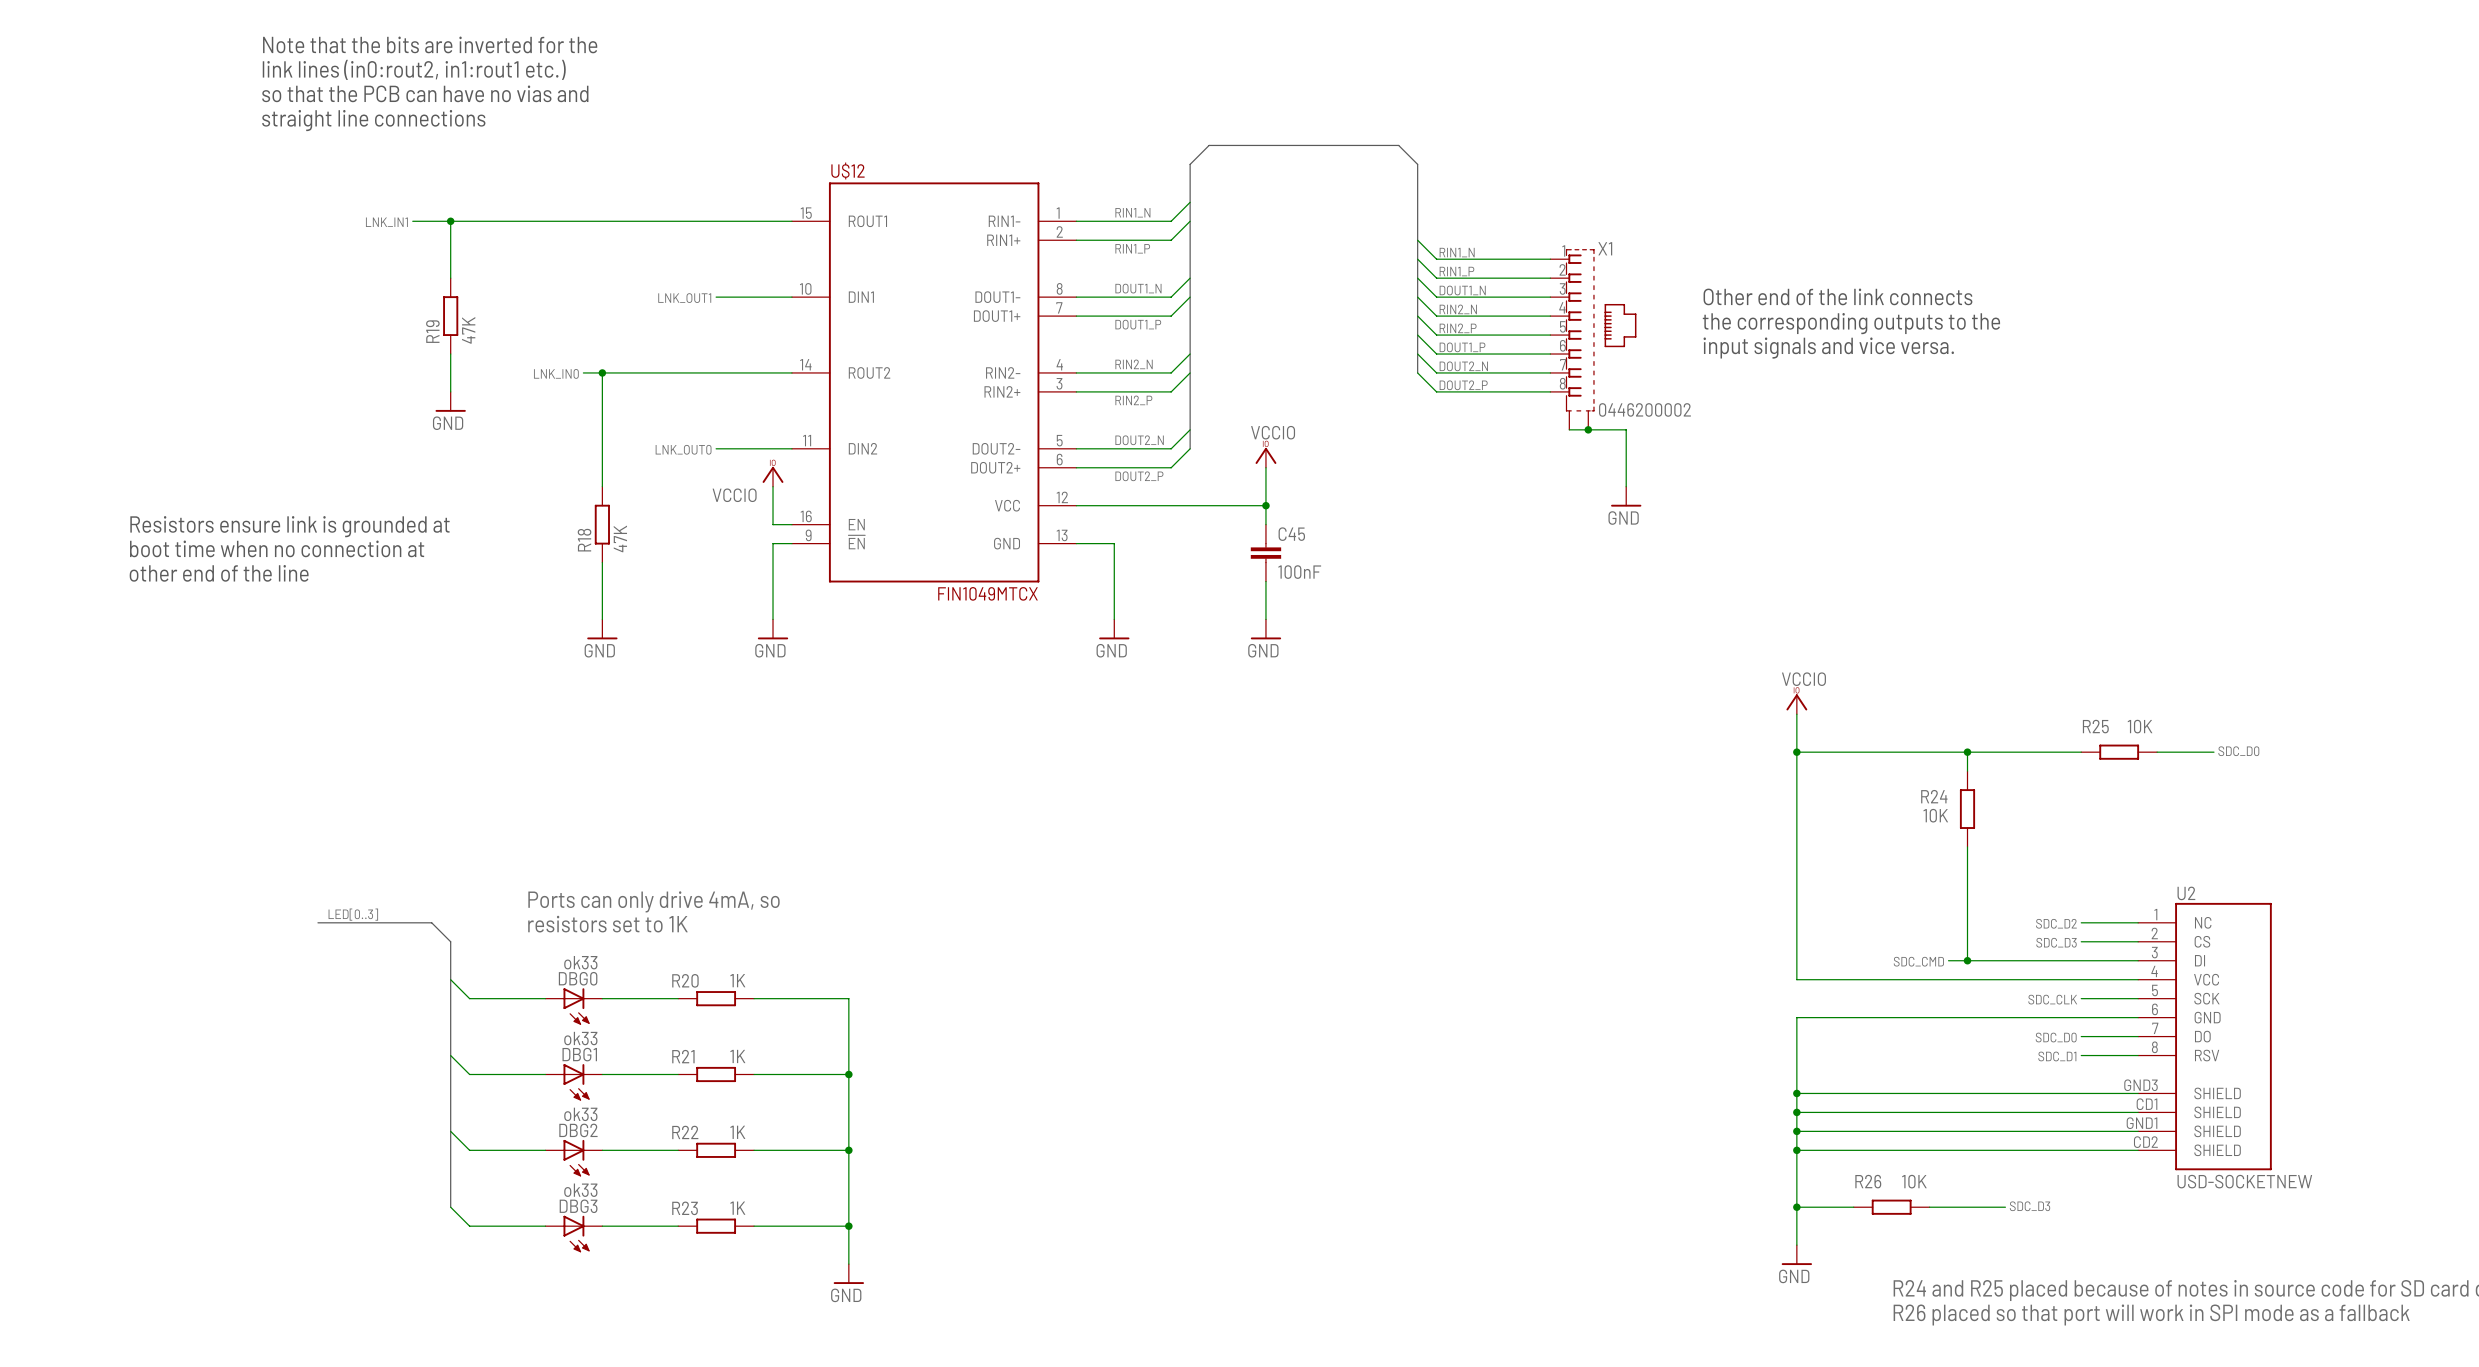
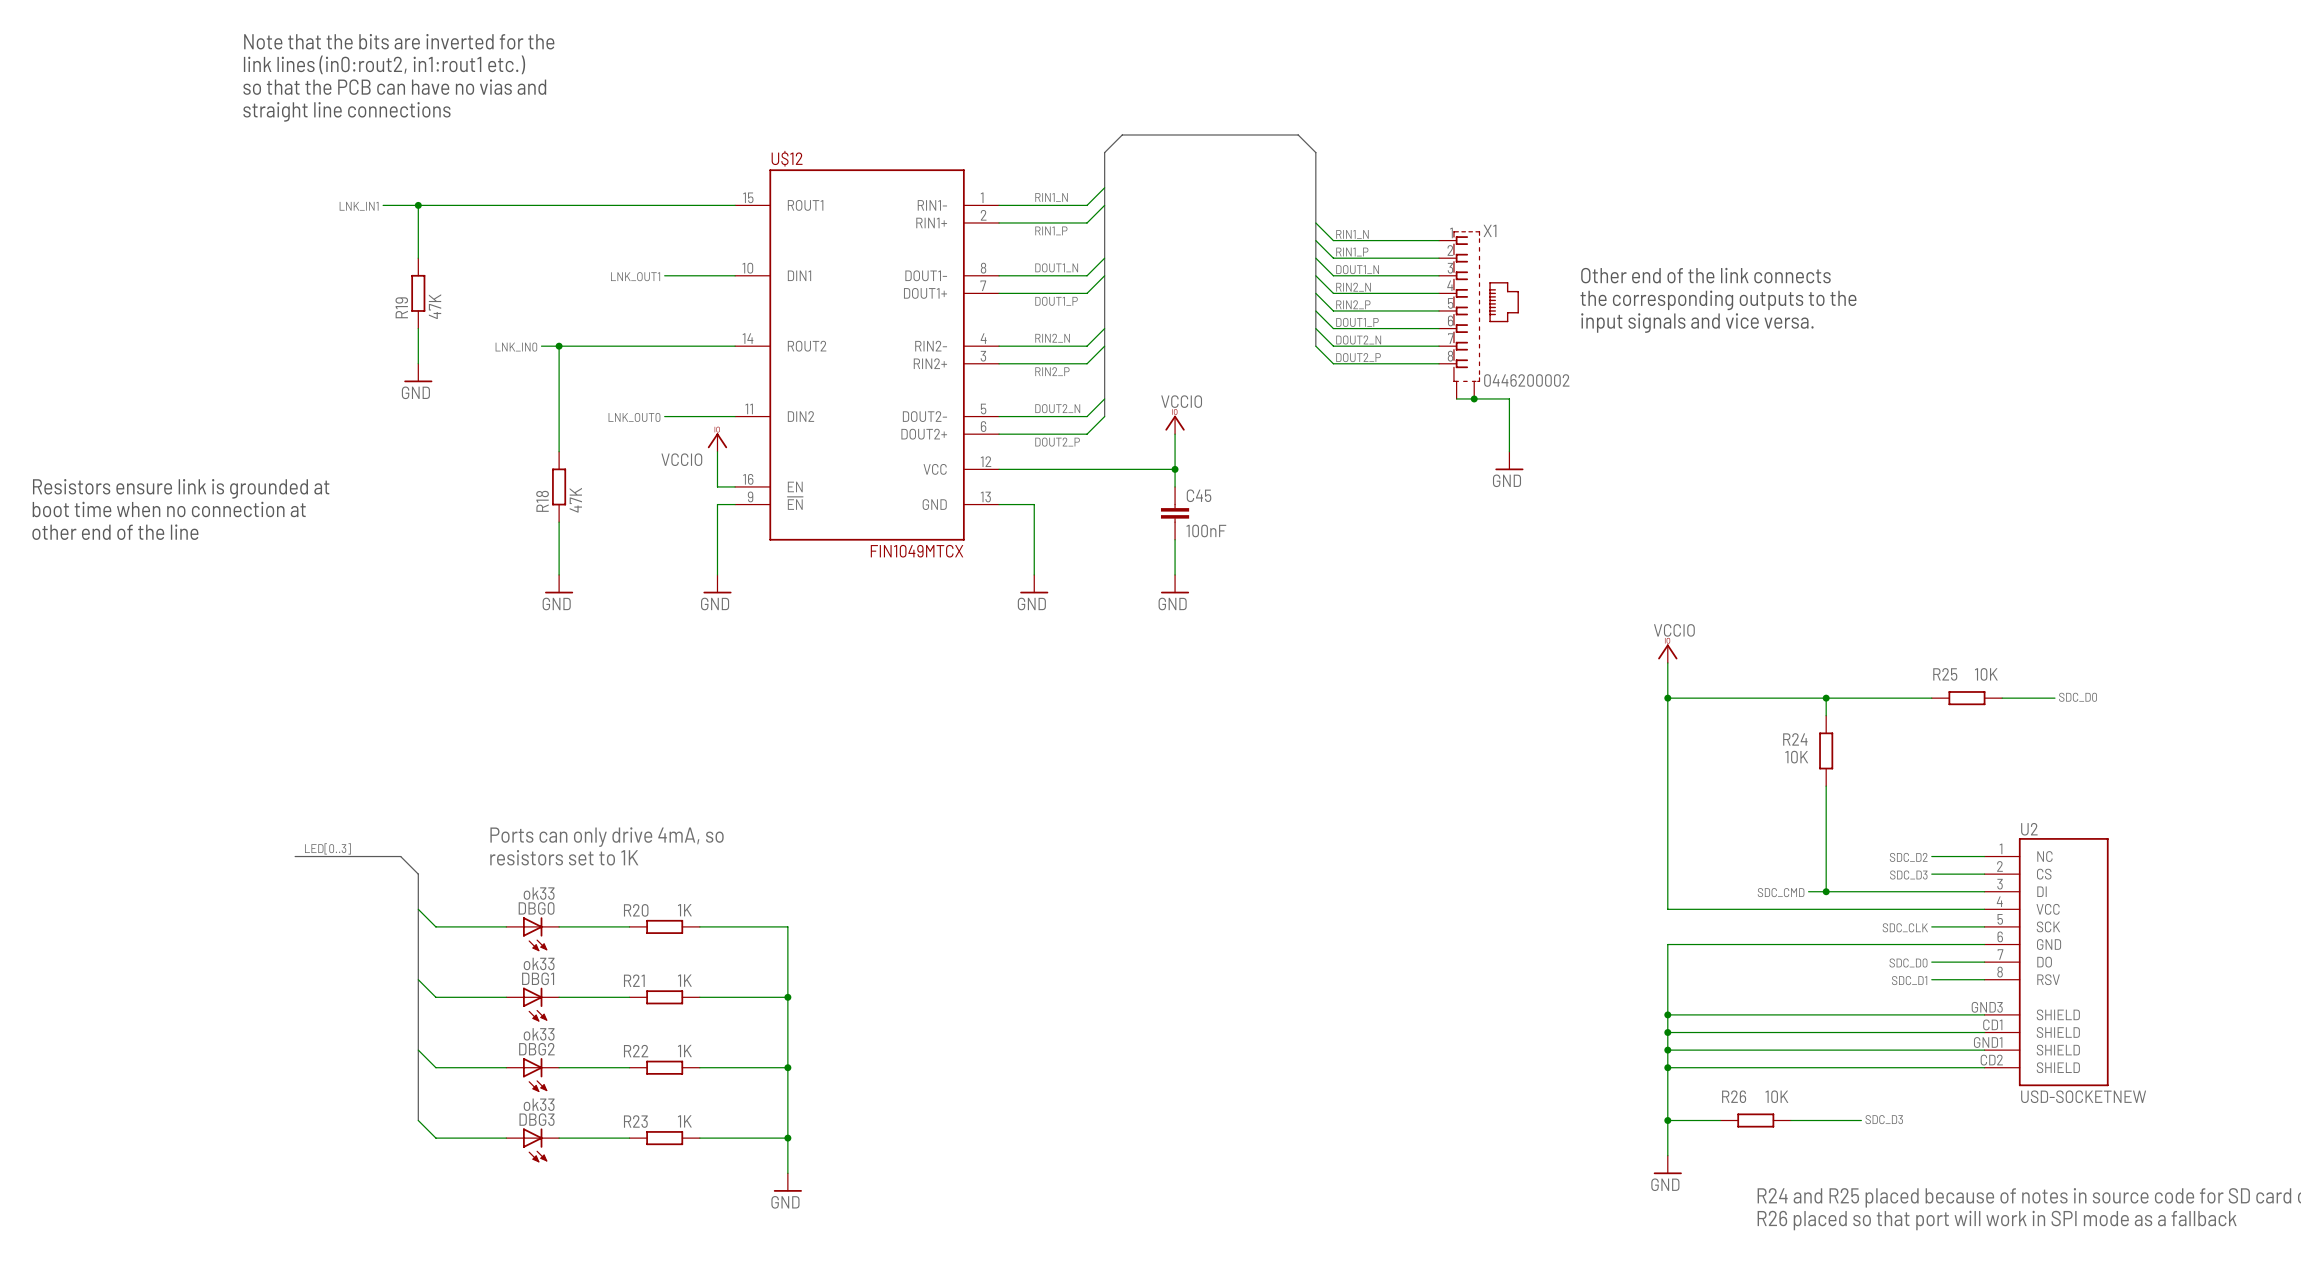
text position: Resistors ensure link is grounded at (289, 526) -> Resistors ensure link is grounded at (181, 488)
text position: boot time when no connection at (277, 548) -> boot time when no connection at (169, 509)
text position: other end of the line (219, 573) -> other end of the line (115, 532)

